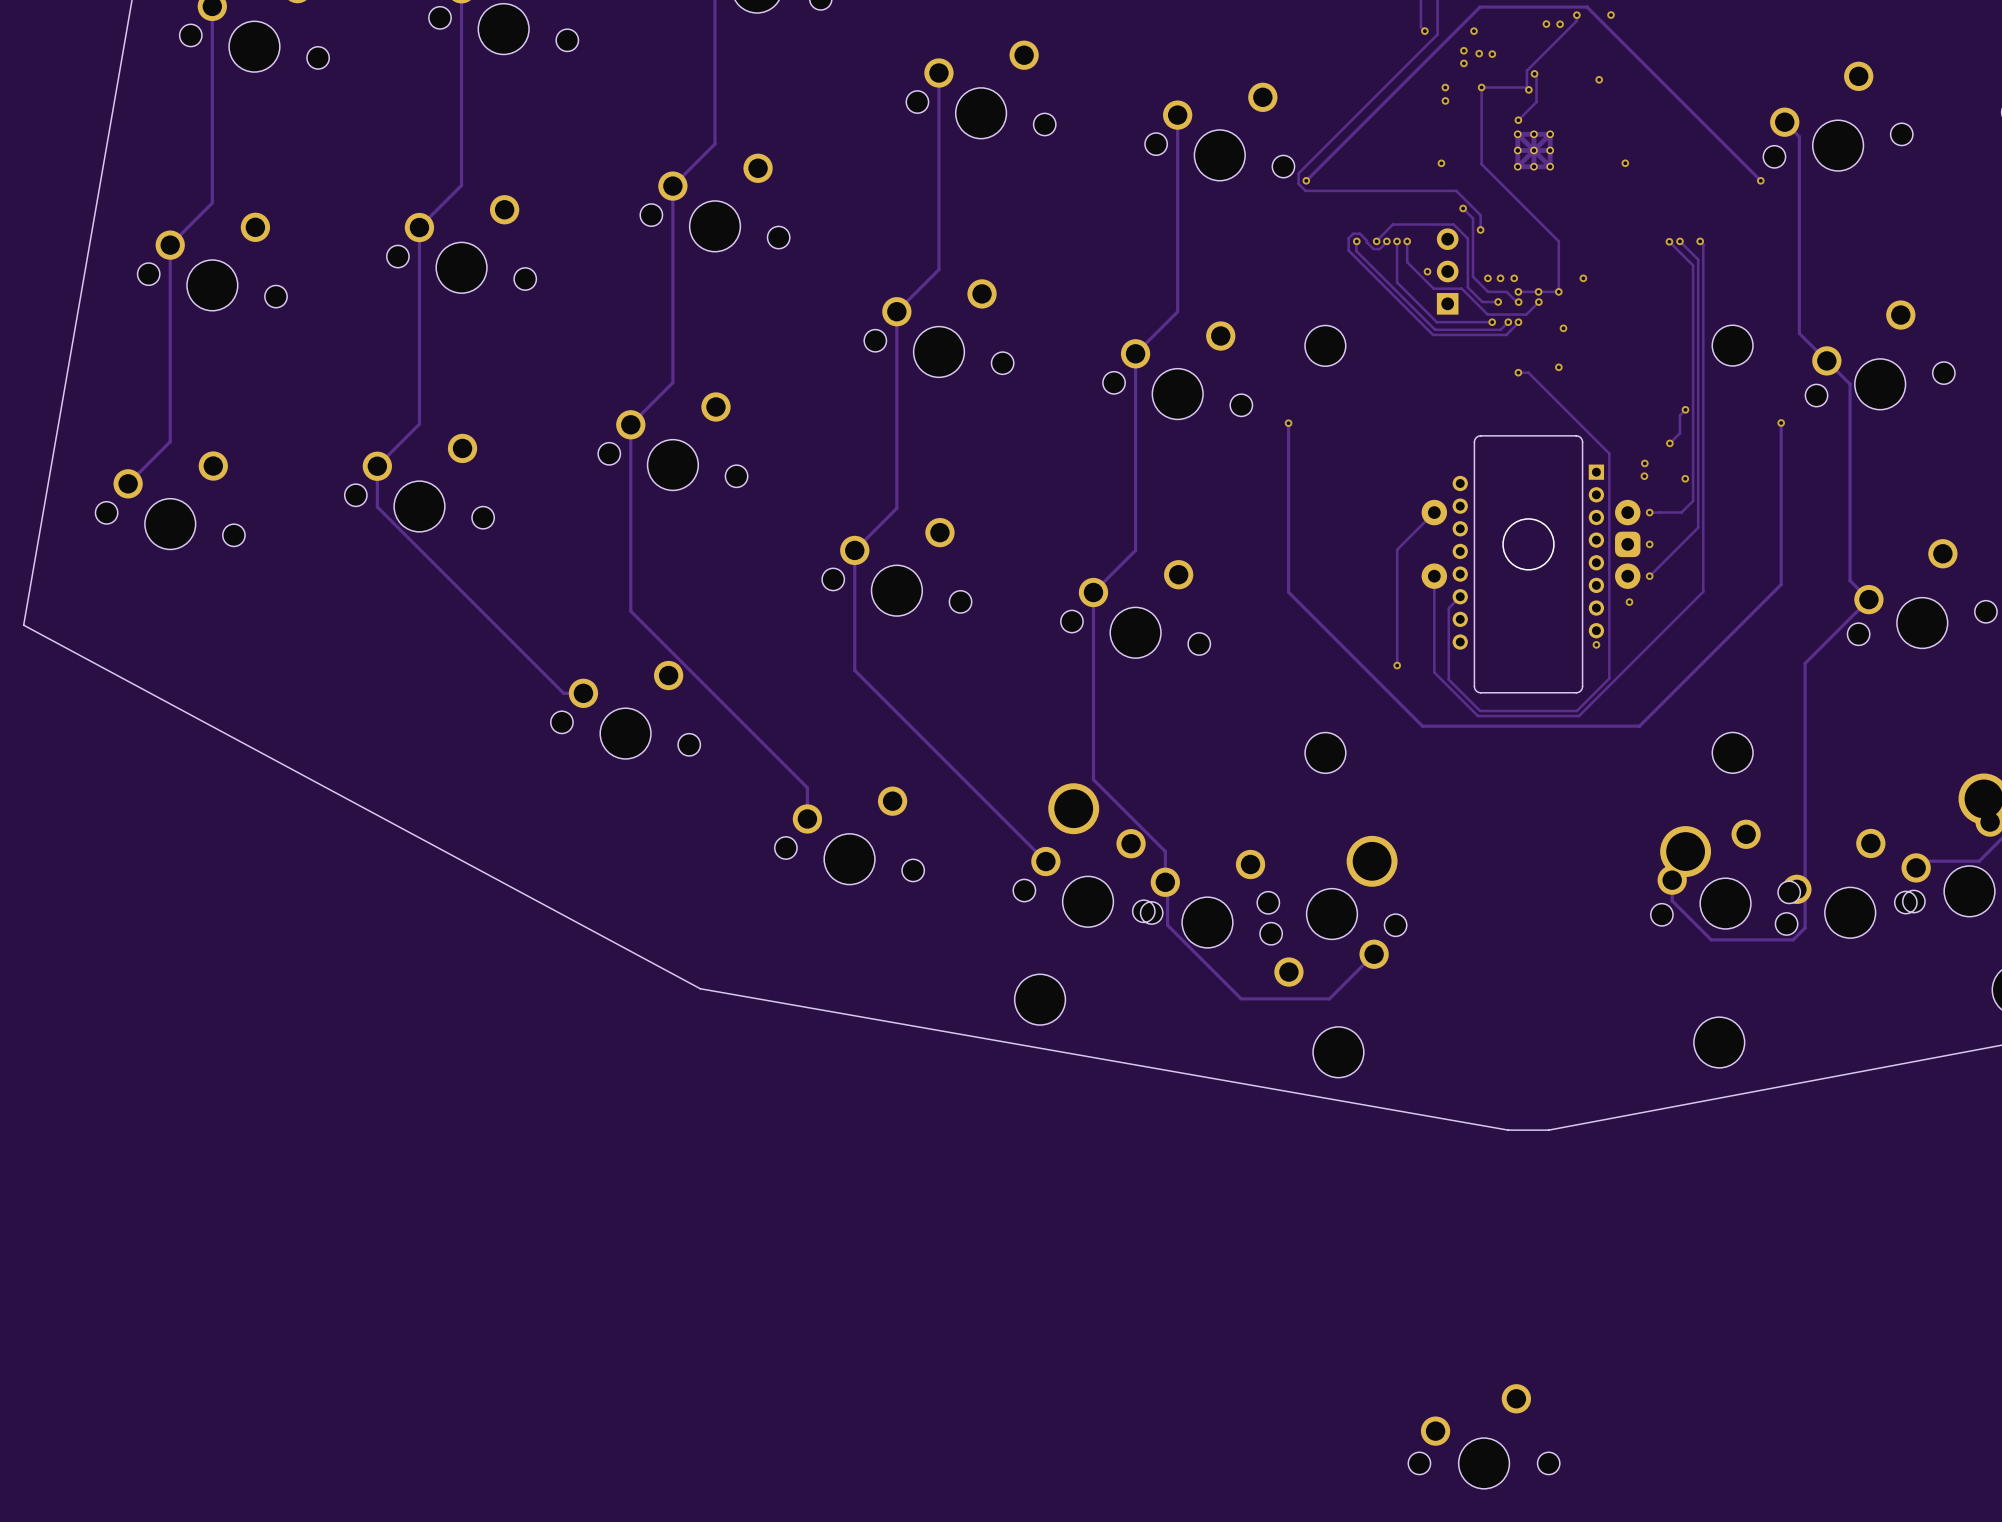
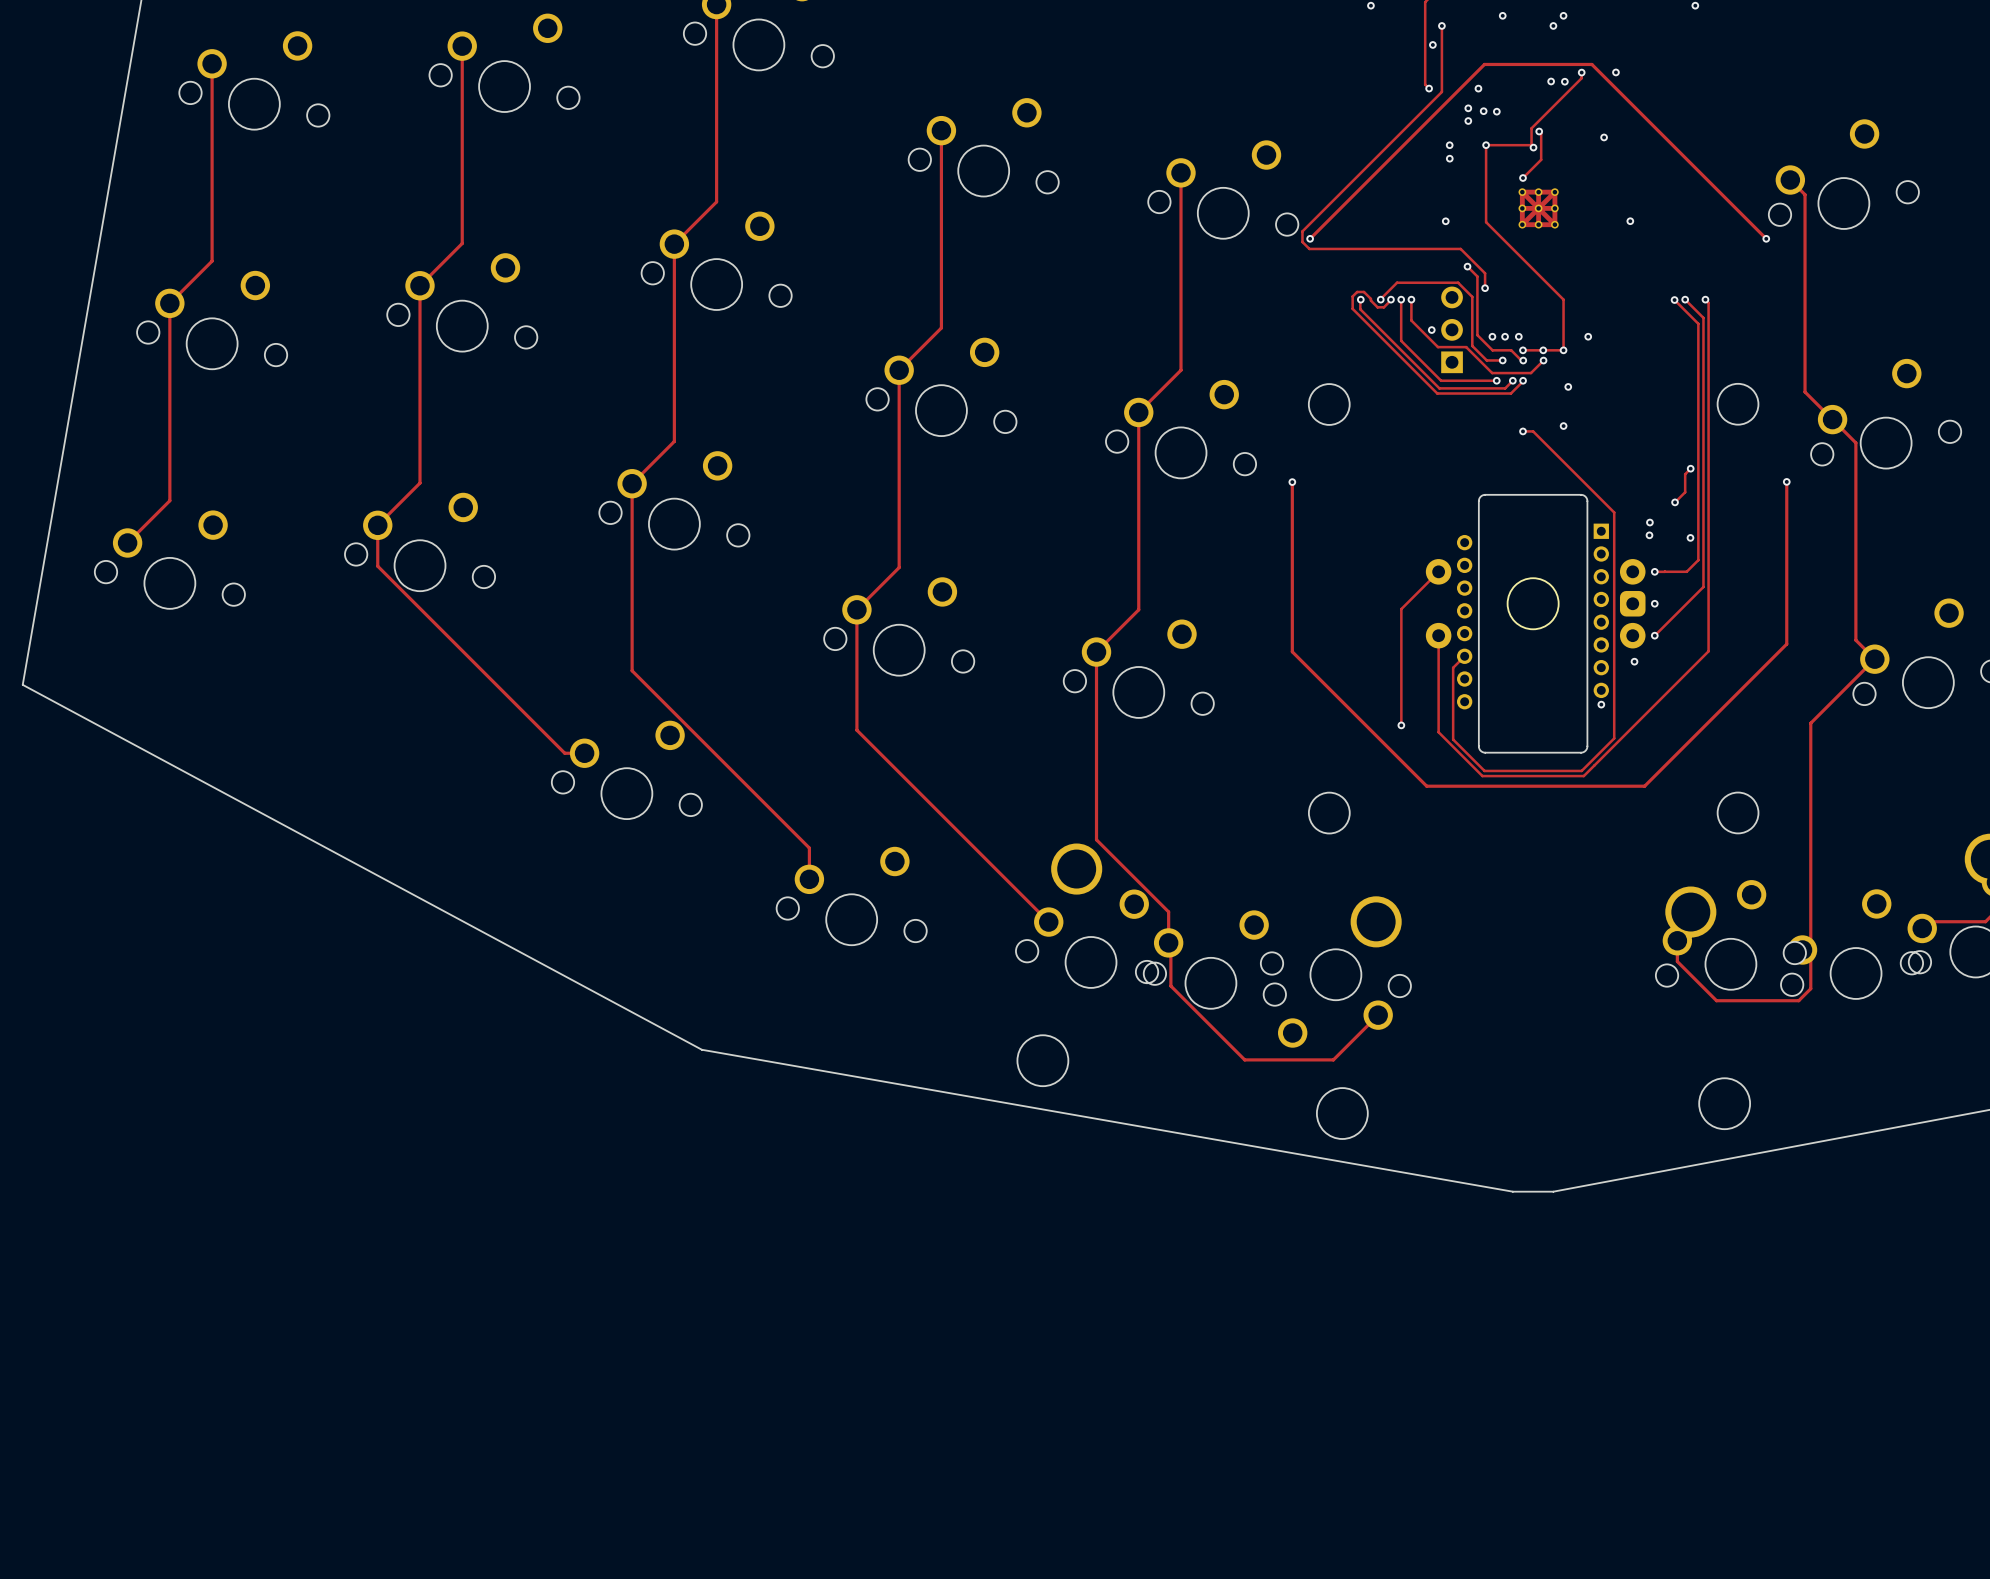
part: (1484, 1436) -> none

